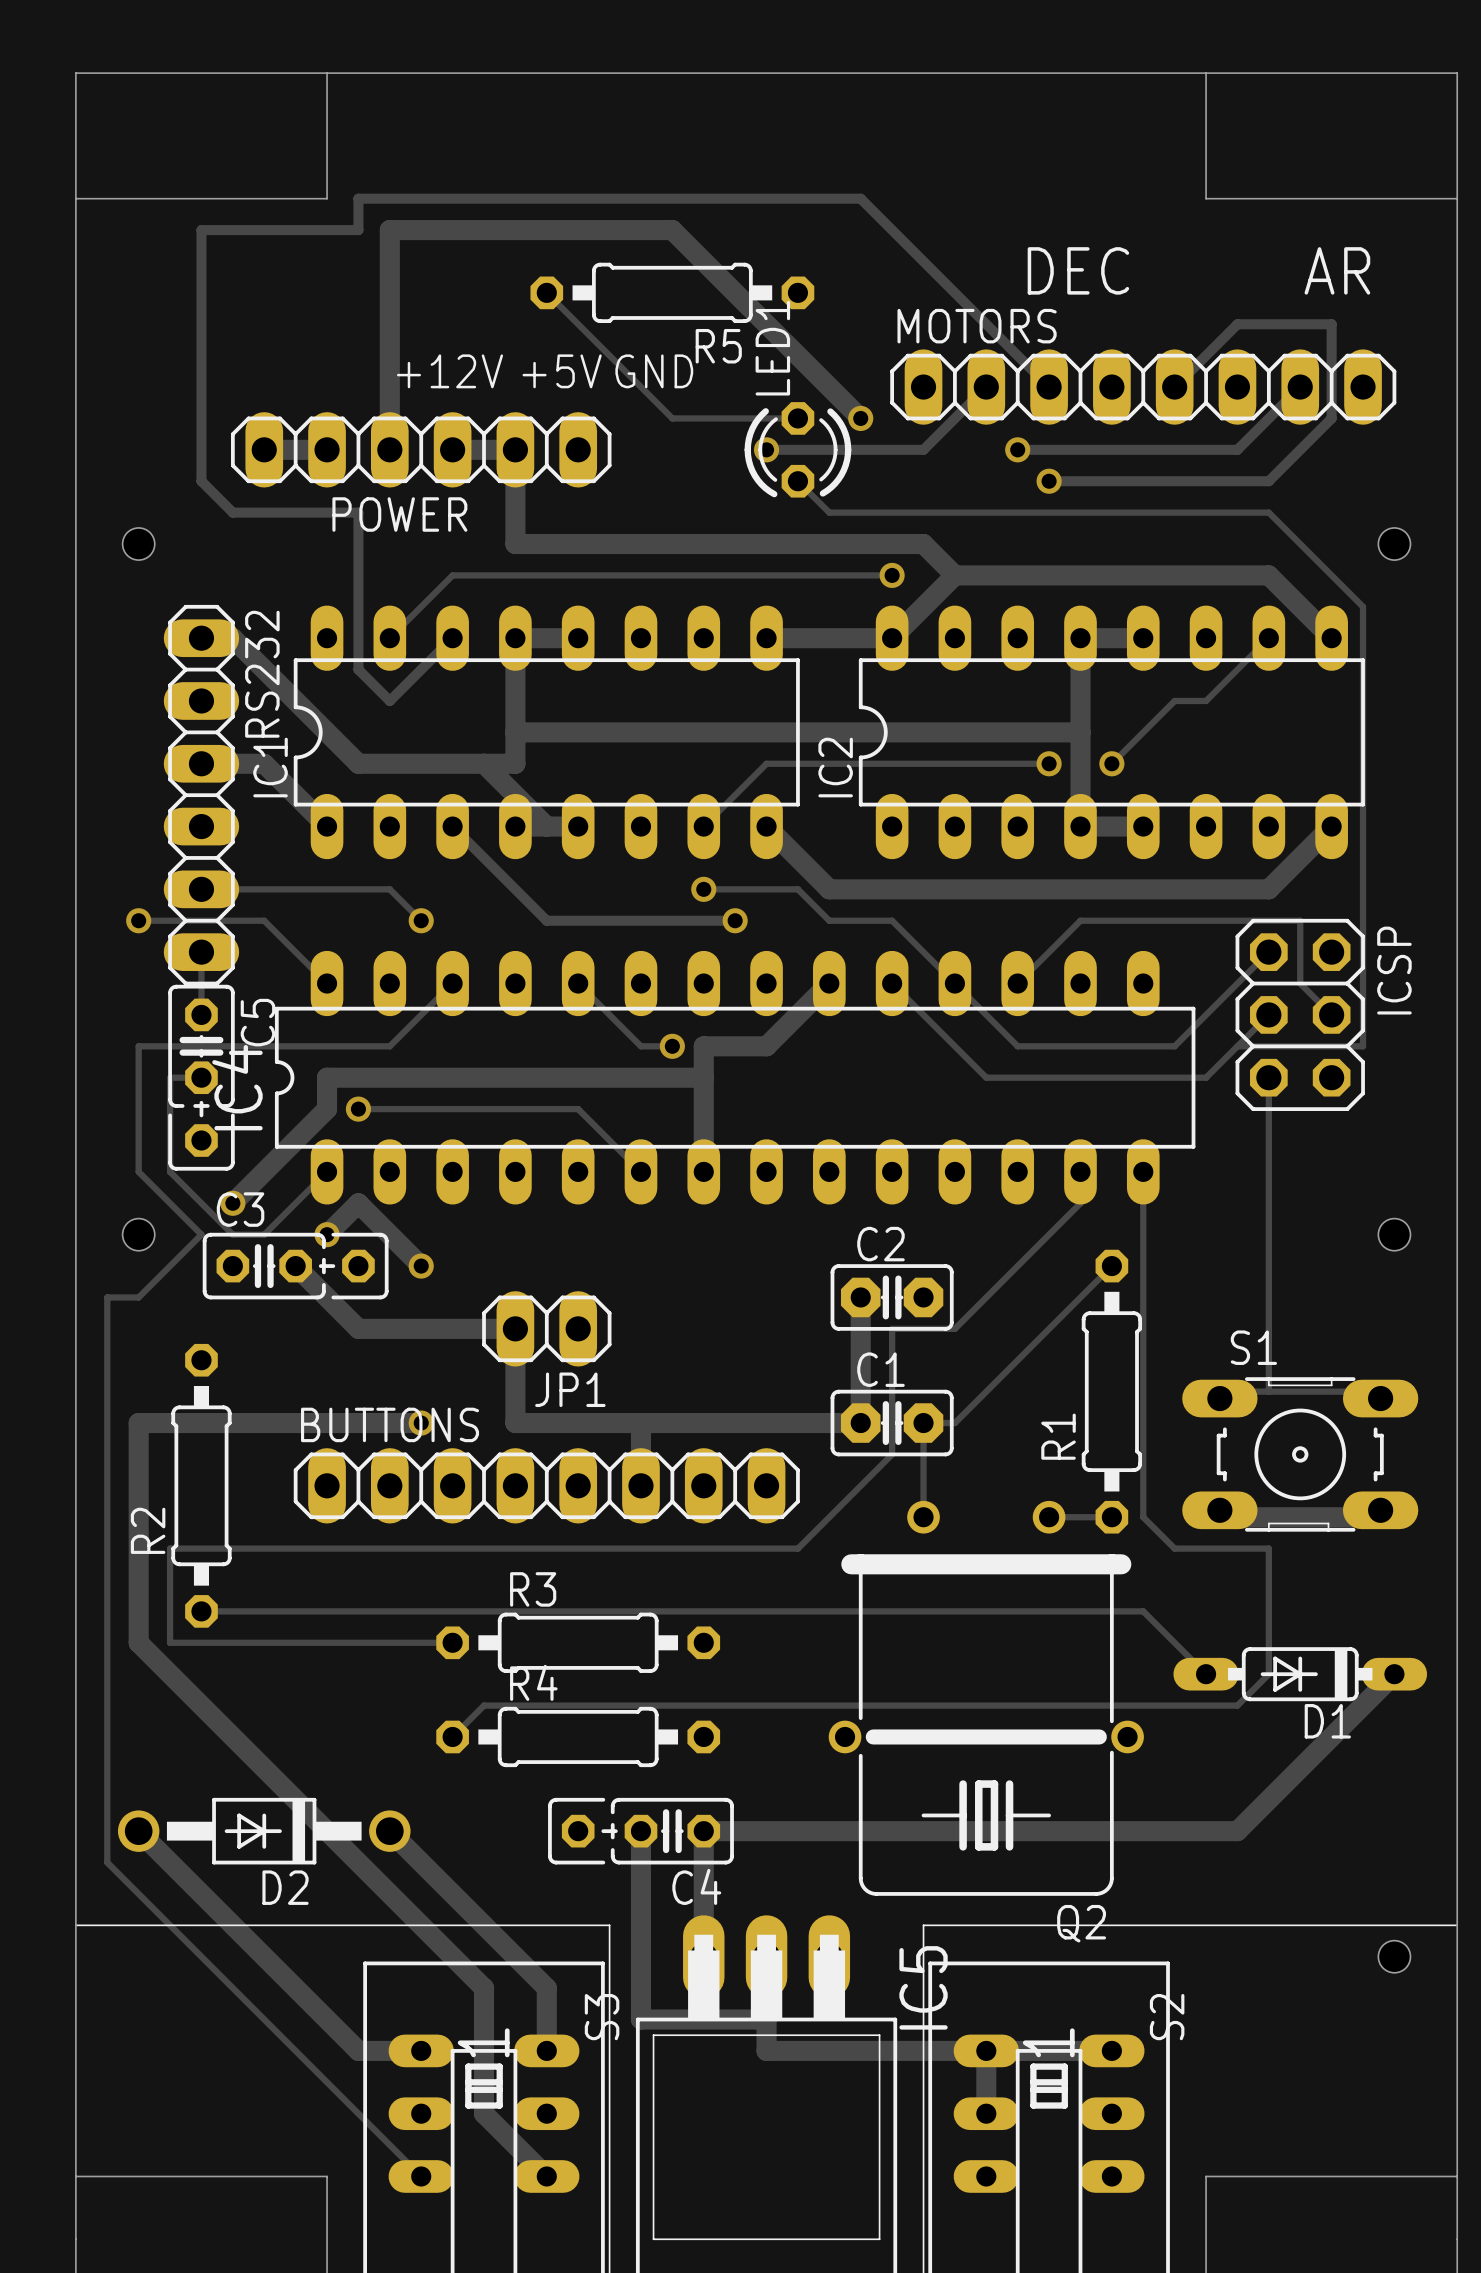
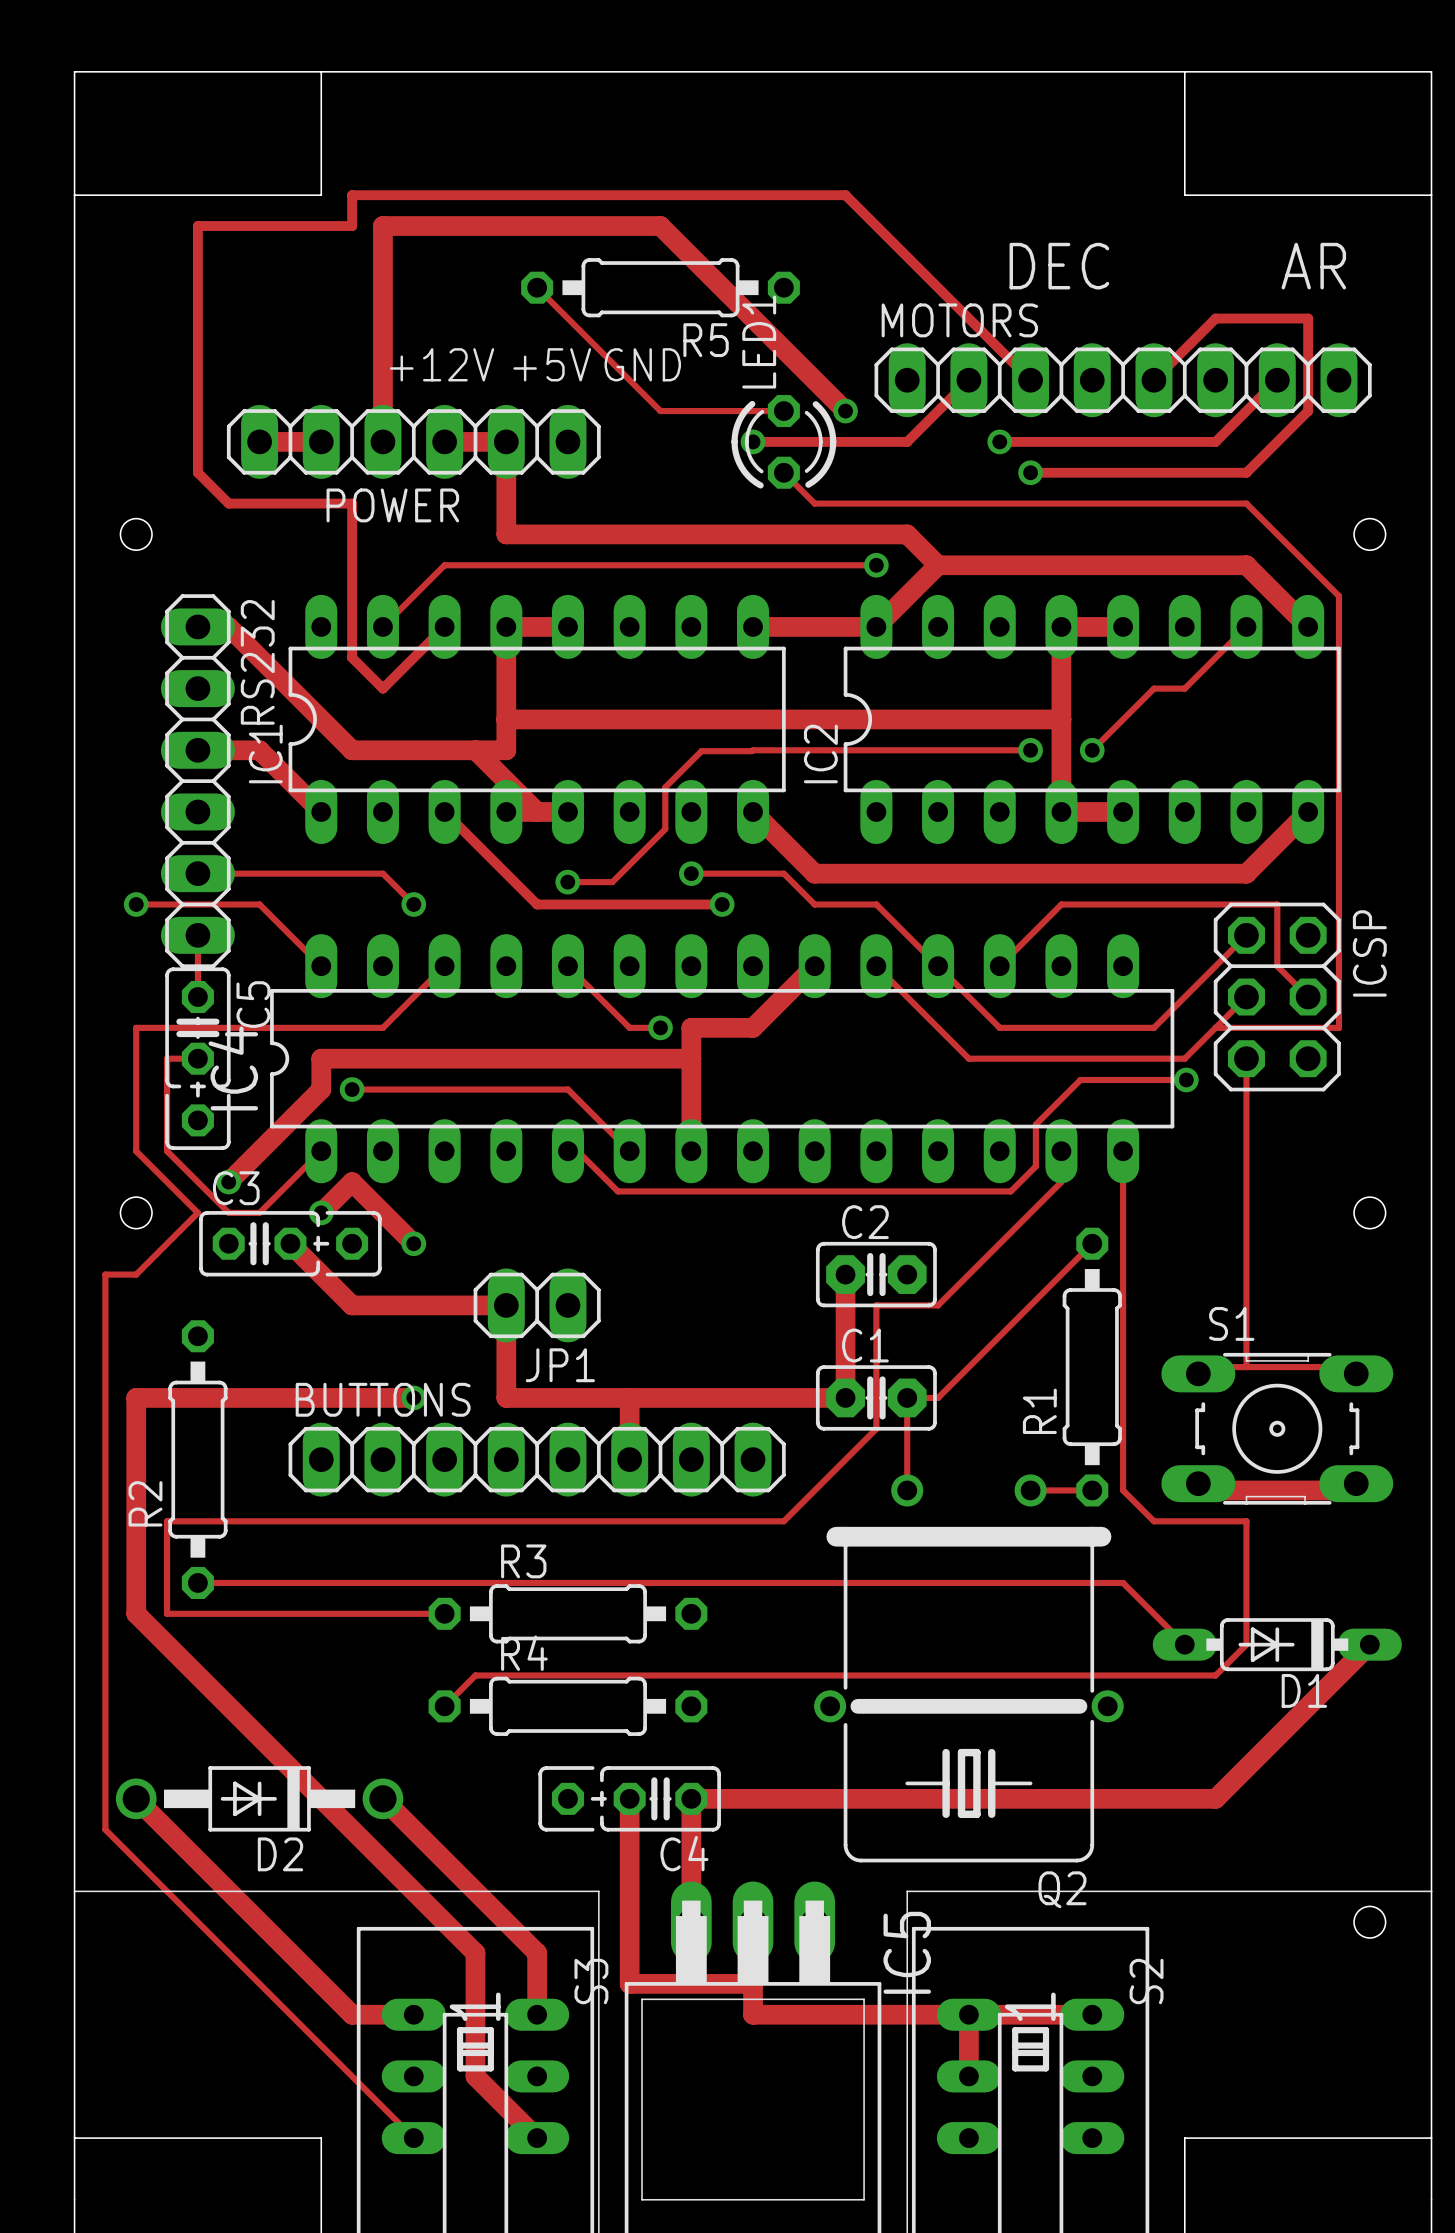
track: (766, 763) (703, 826) -> (753, 750) (701, 751) (665, 787) (665, 829) (612, 882) (567, 882)
via: none -> (567, 882)
track: none -> (1186, 1079) (1080, 1079) (1035, 1124) (1035, 1166) (1010, 1191) (617, 1191) (578, 1152) (567, 1151)
via: none -> (1186, 1079)

